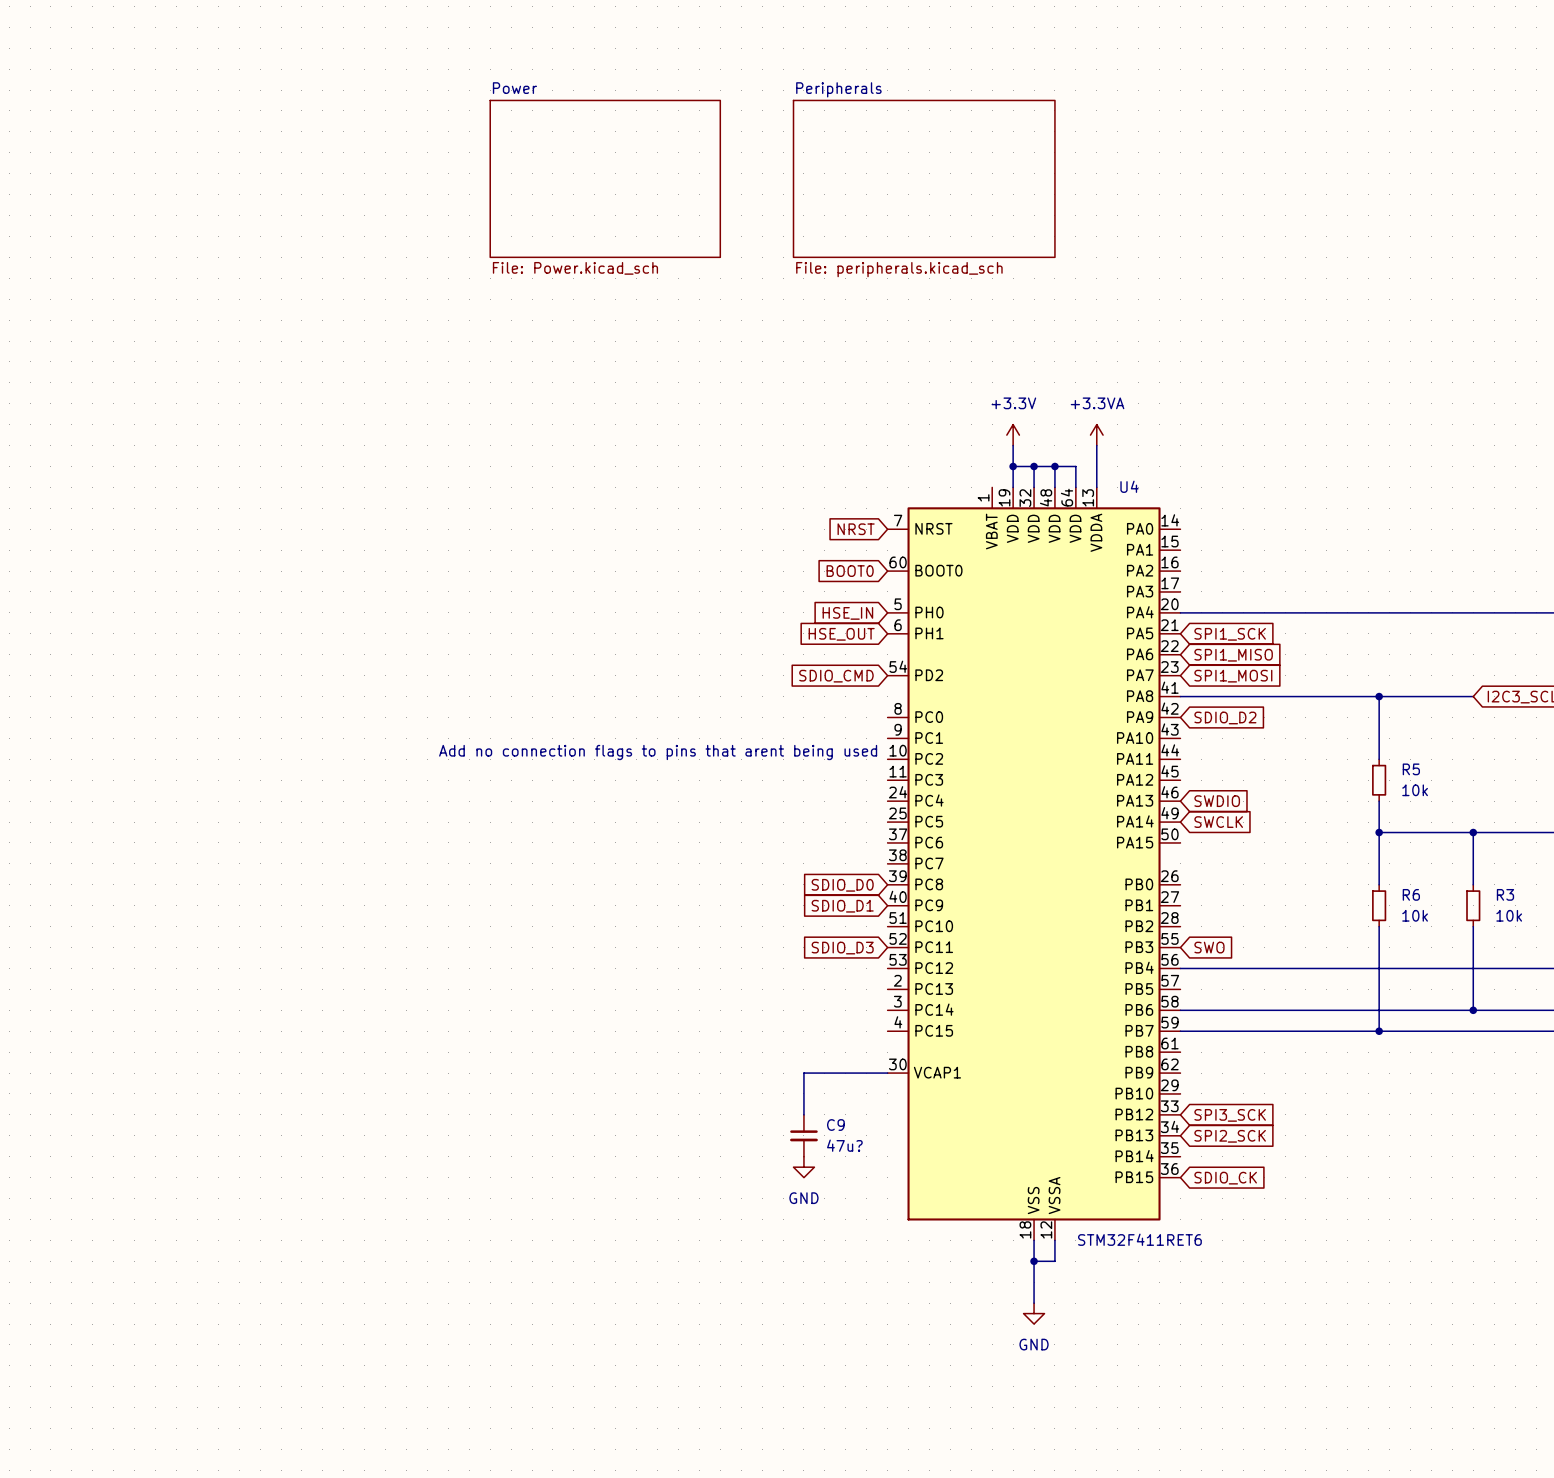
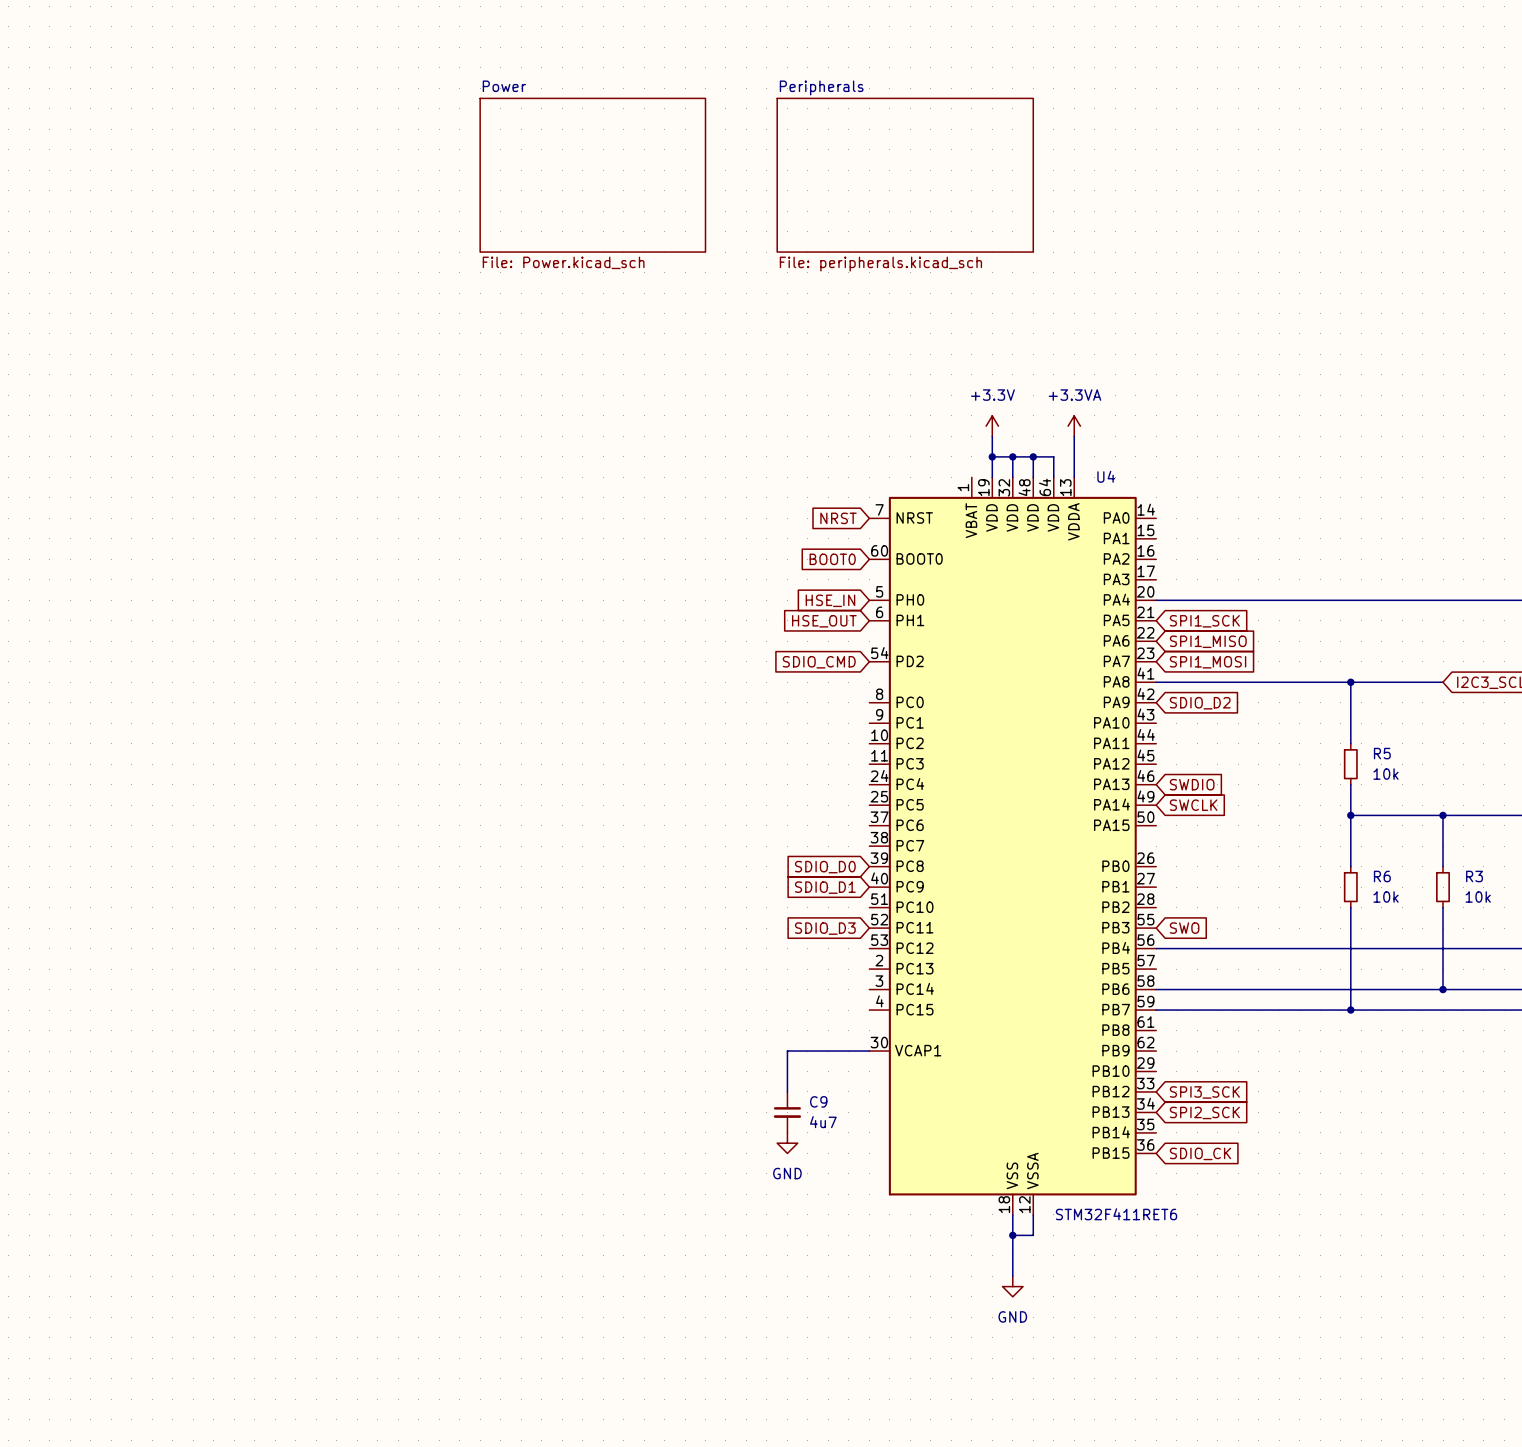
text: Add no connection flags to pins that arent being used (658, 752) -> none
C9 value: 47u? (844, 1145) -> 4u7 (823, 1122)

